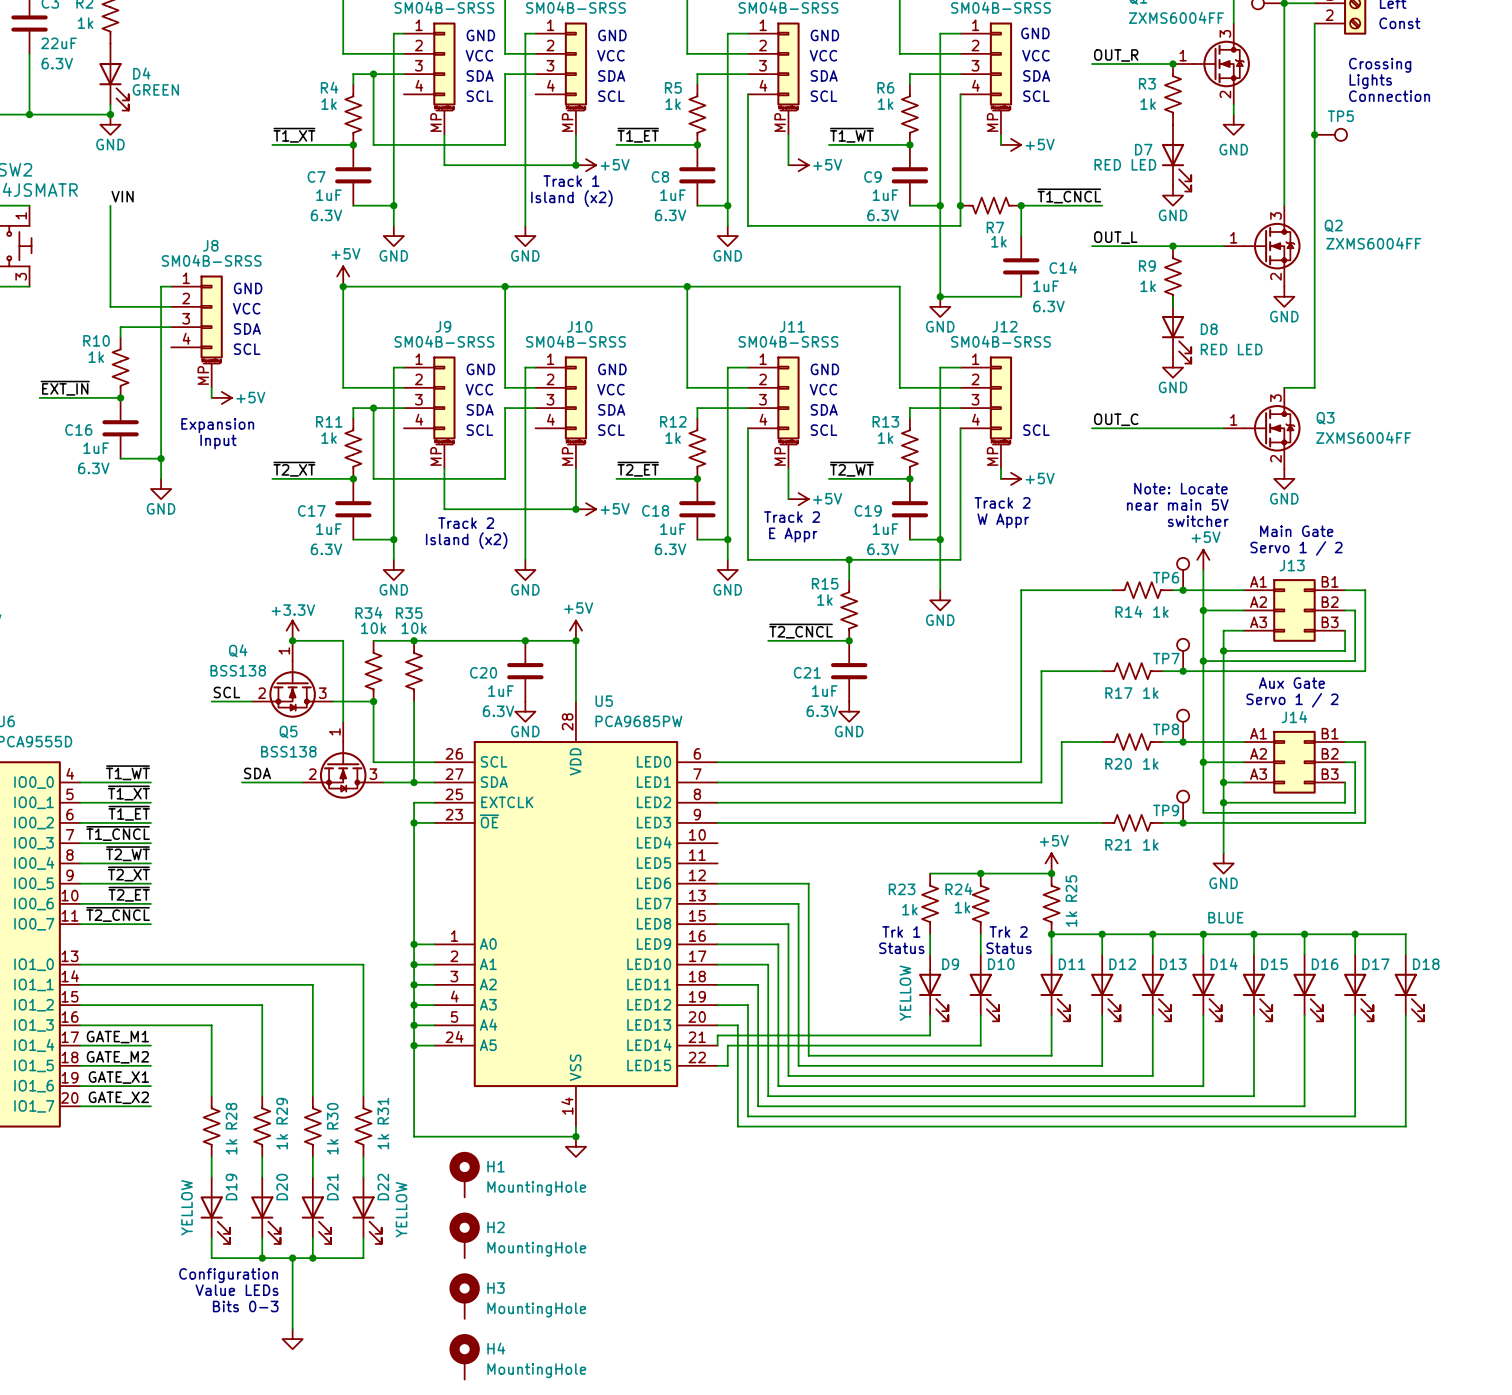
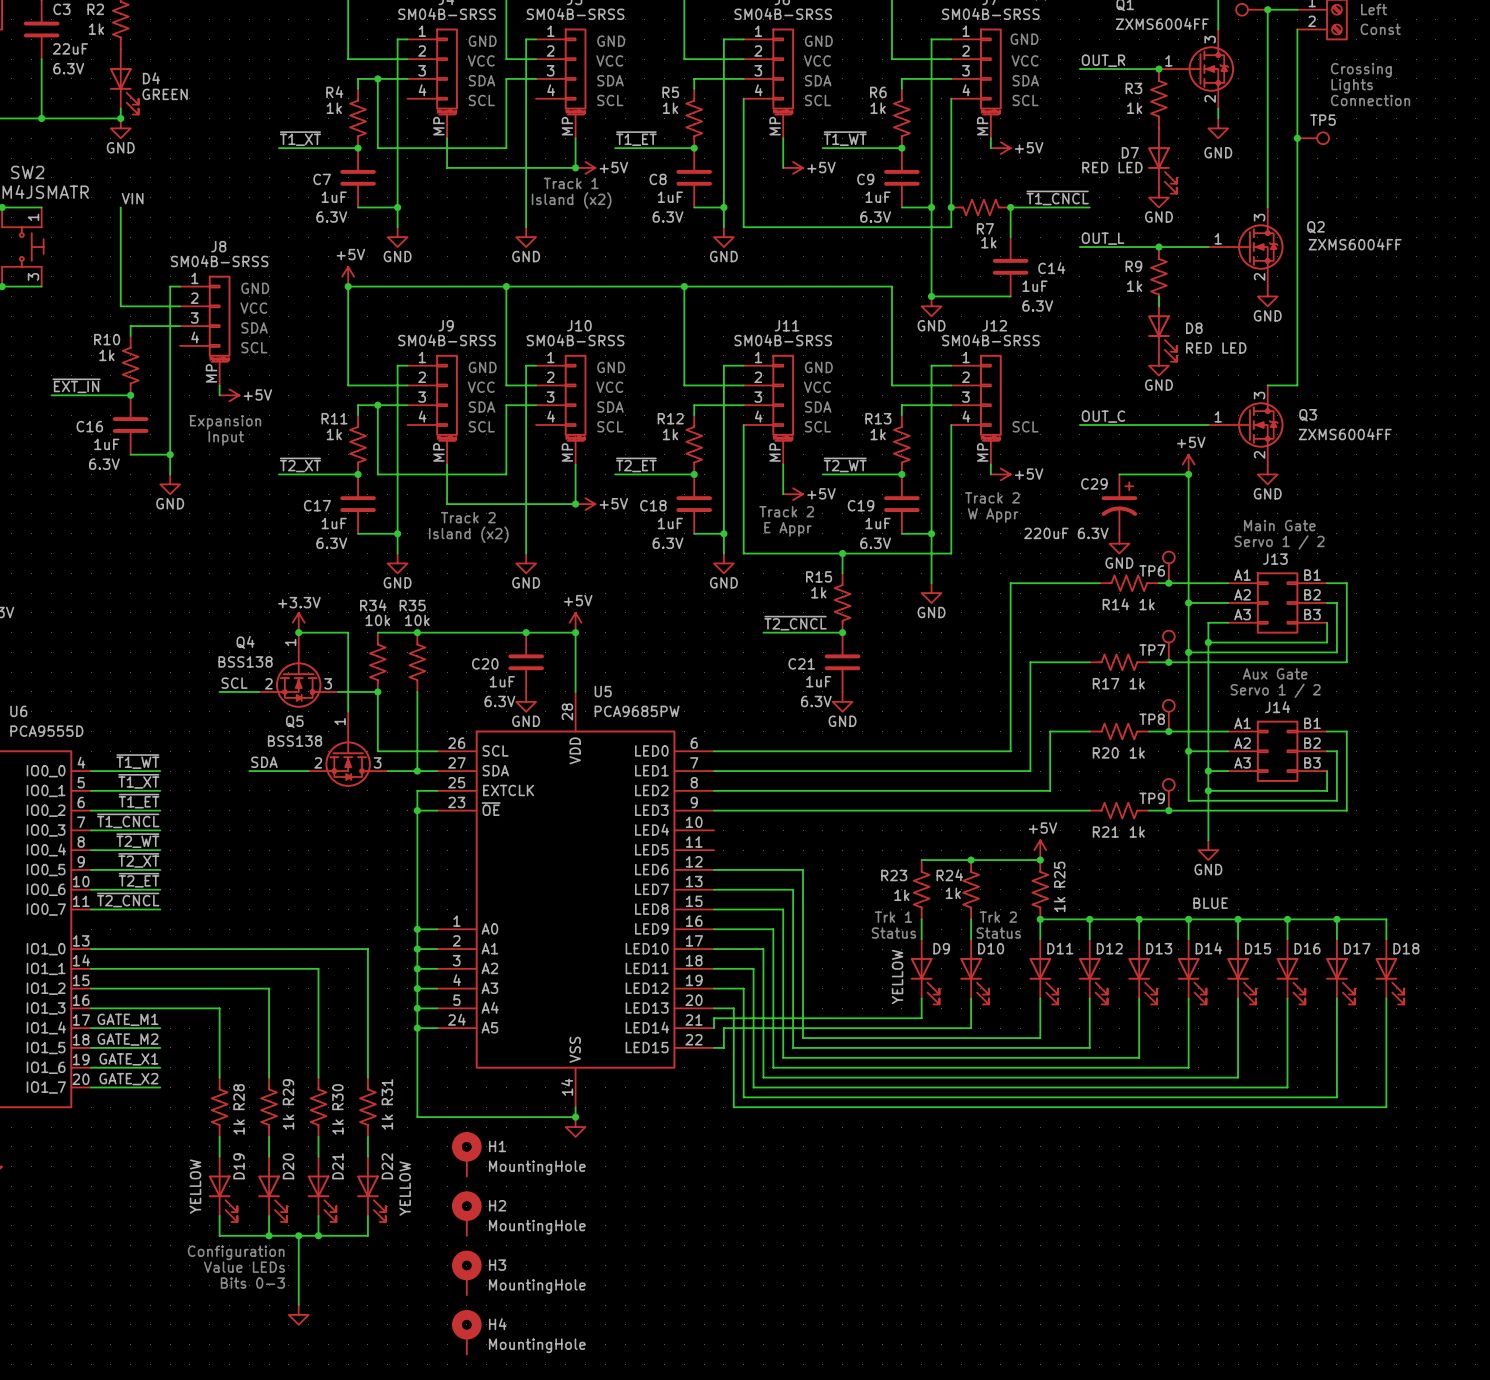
wire: none -> (1119, 474) (1188, 474) (1188, 563)
junction: none -> (1188, 474)
text: Note: Locate (1180, 488) -> none
text: near main 5V (1177, 504) -> none
C29: none -> 220uF 6.3V (1119, 504)
text: switcher (1198, 521) -> none
power symbol: none -> GND (1119, 543)
power symbol position: +5V (1203, 559) -> +5V (1188, 464)

